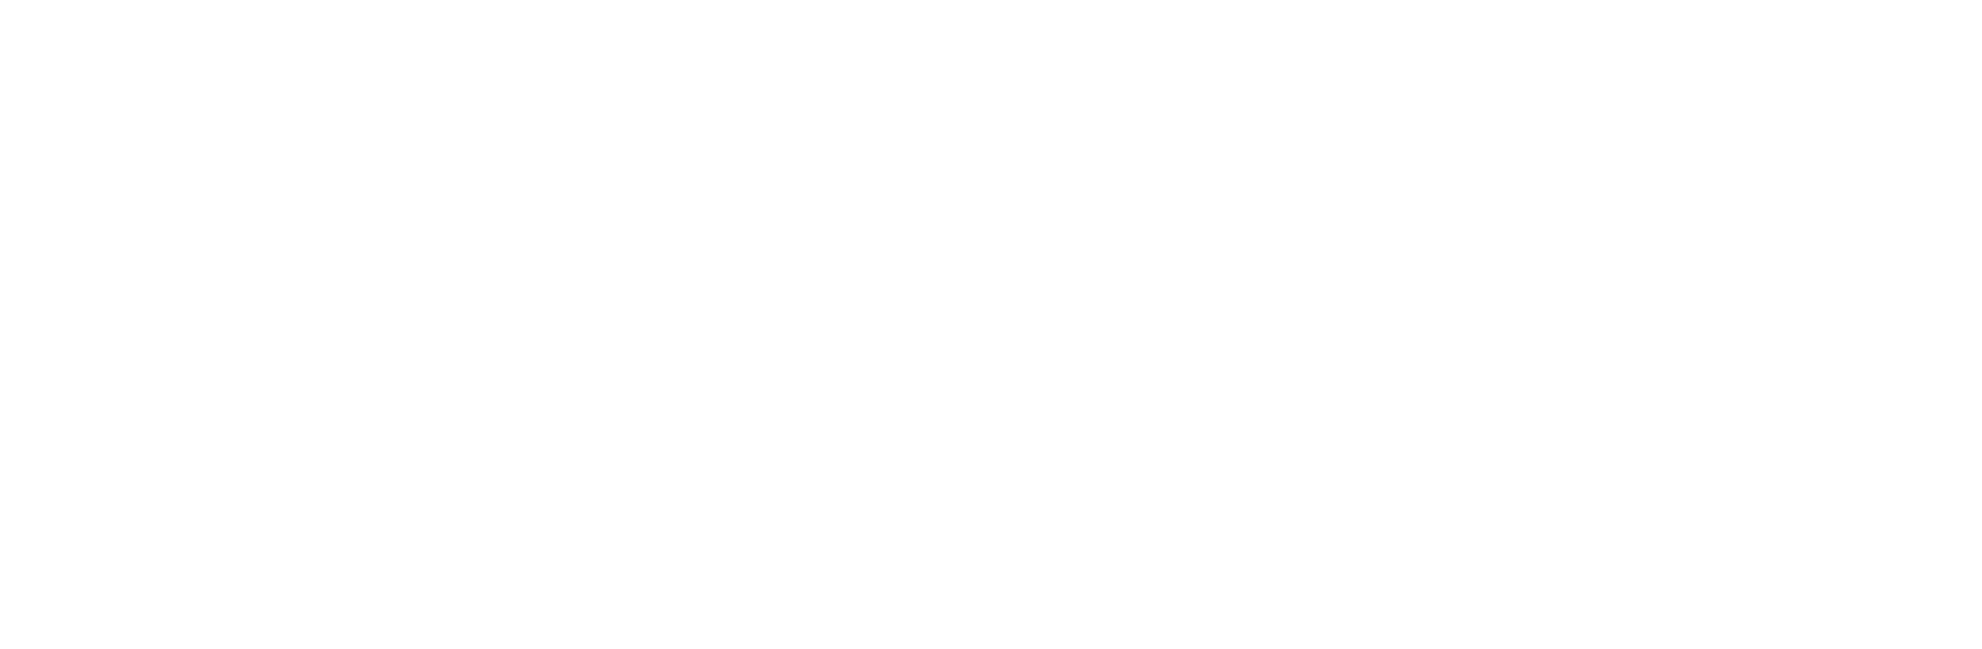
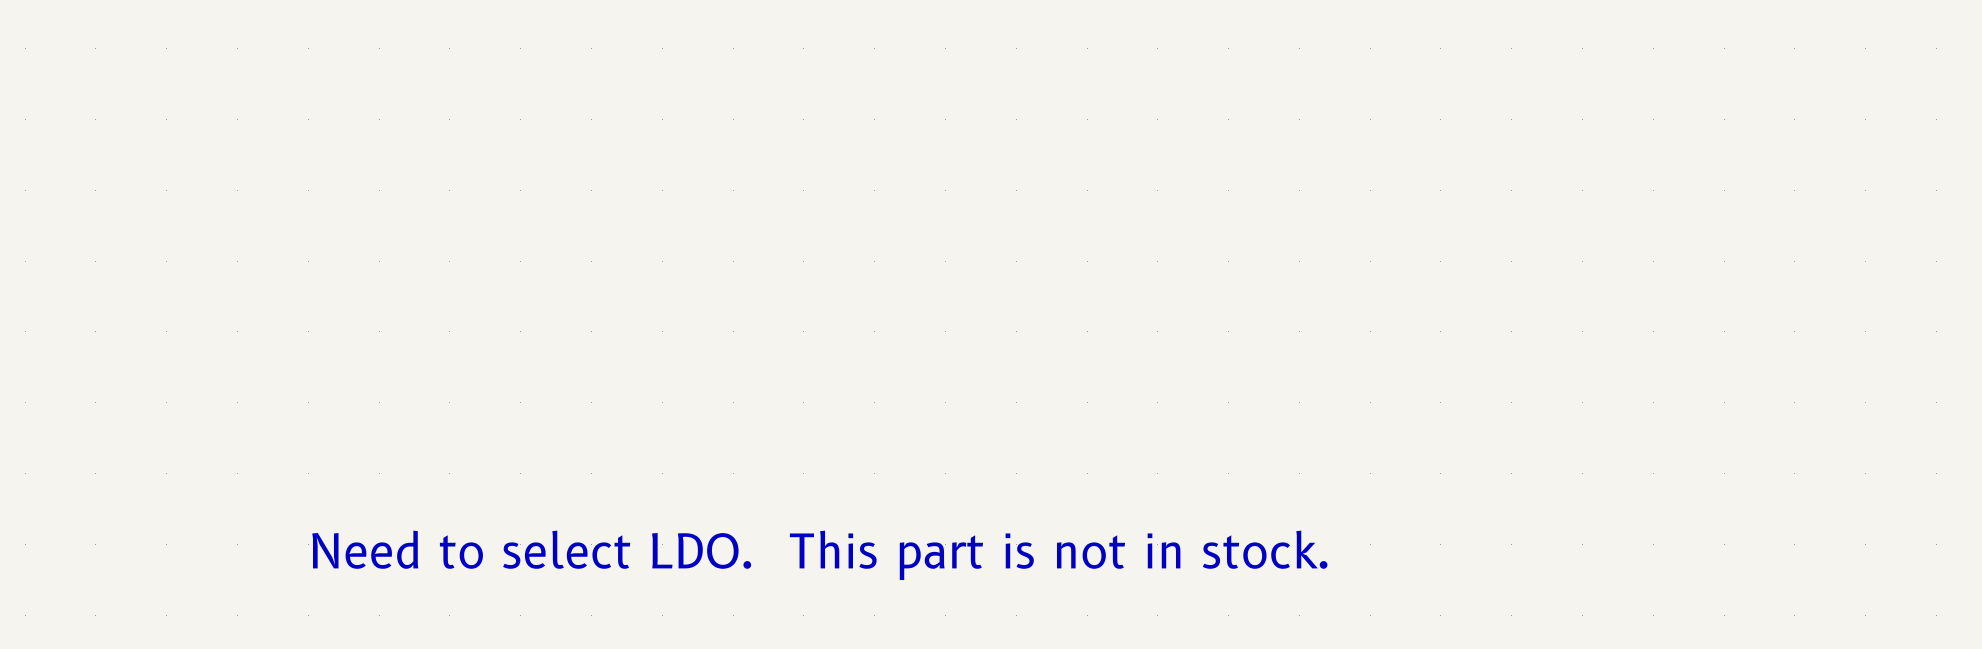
text: none -> Need to select LDO. This part is not in stock. (819, 555)

